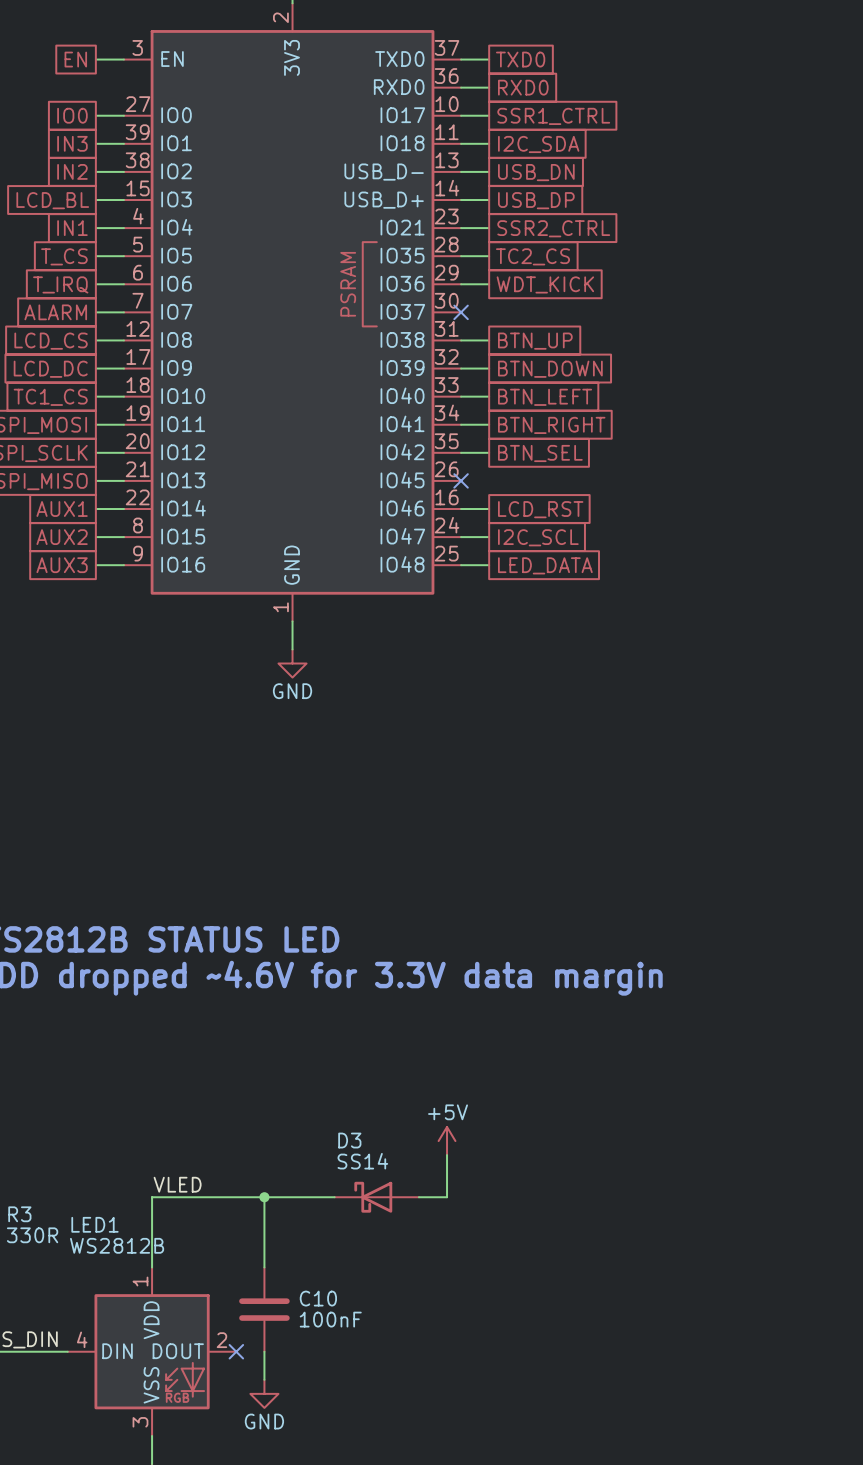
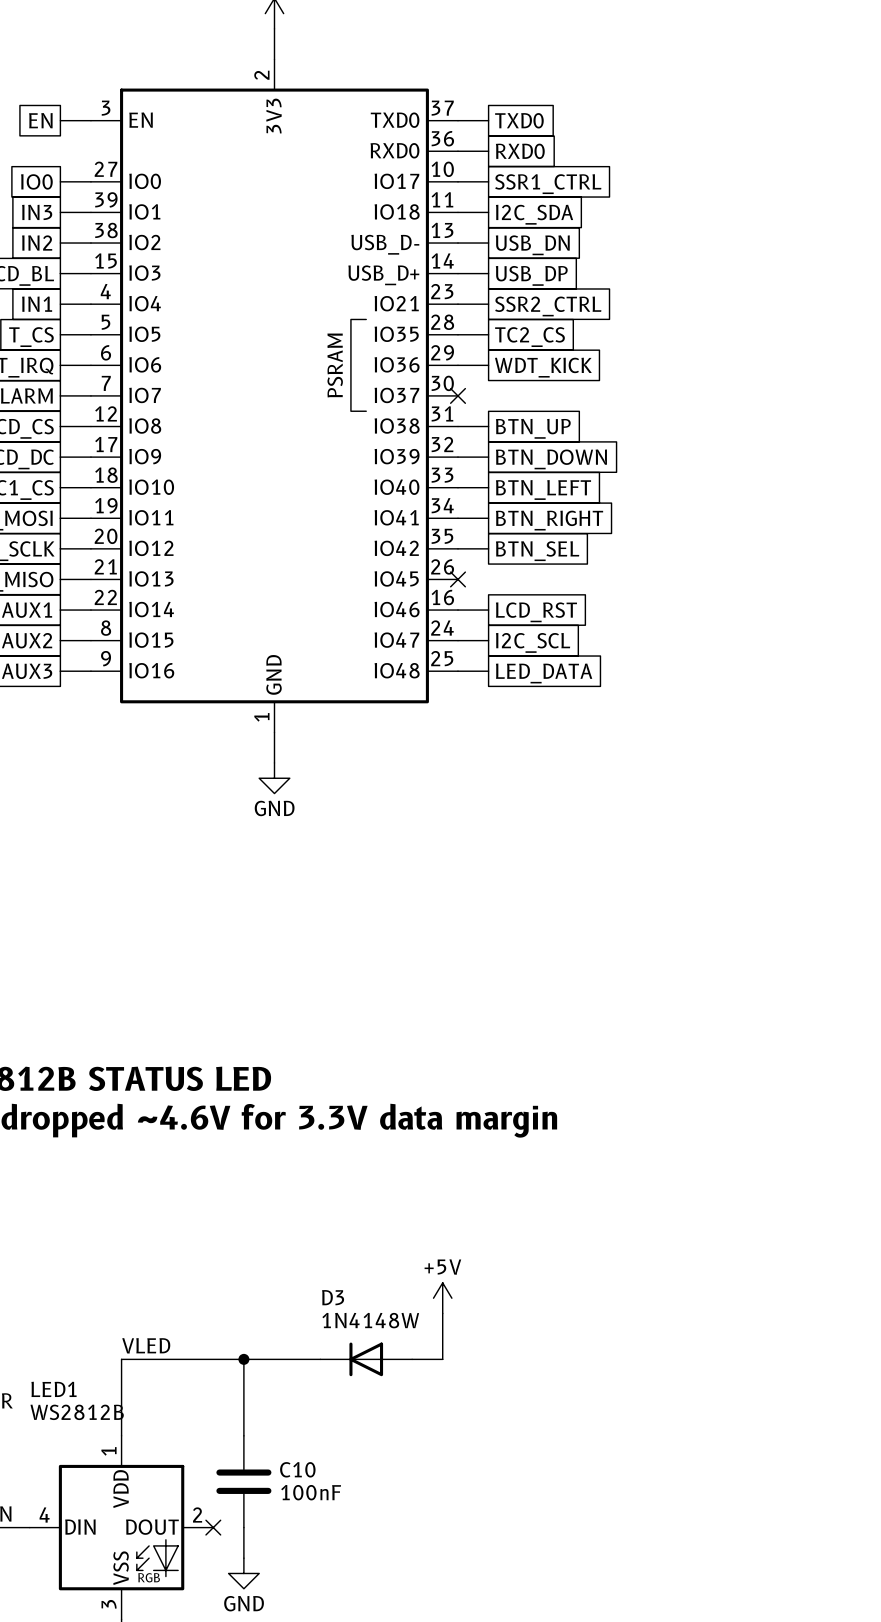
D3 value: SS14 (362, 1161) -> 1N4148W (370, 1320)
D3 symbol: [334, 1181, 419, 1213] -> [320, 1342, 413, 1377]

